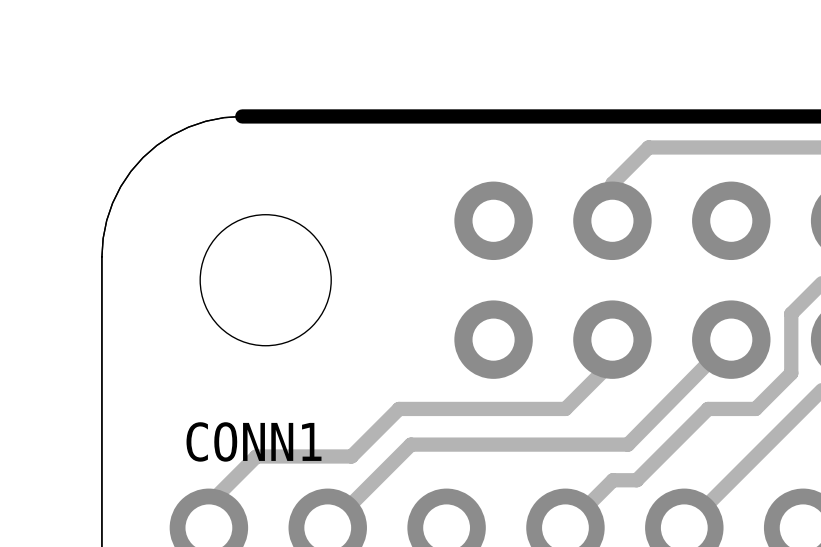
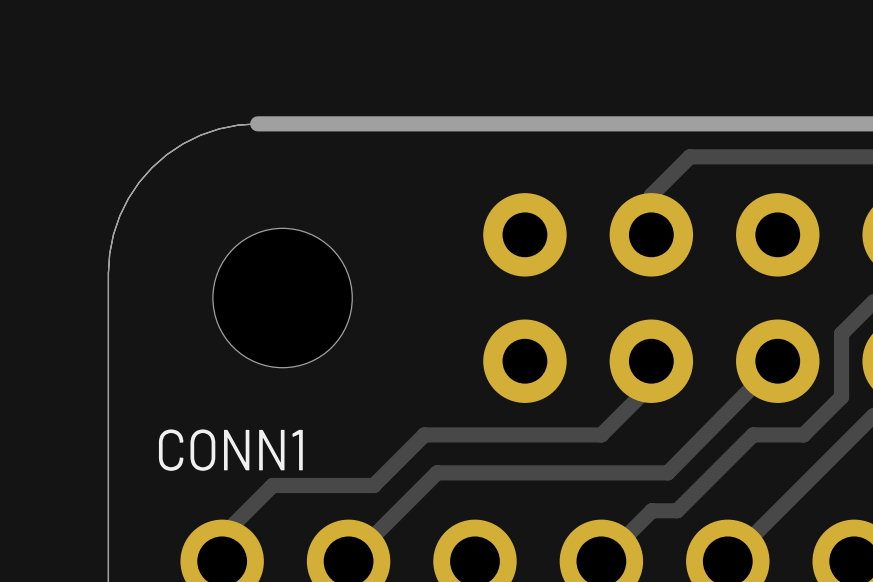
CONN1 name position: CONN1 (254, 441) -> CONN1 (230, 450)

